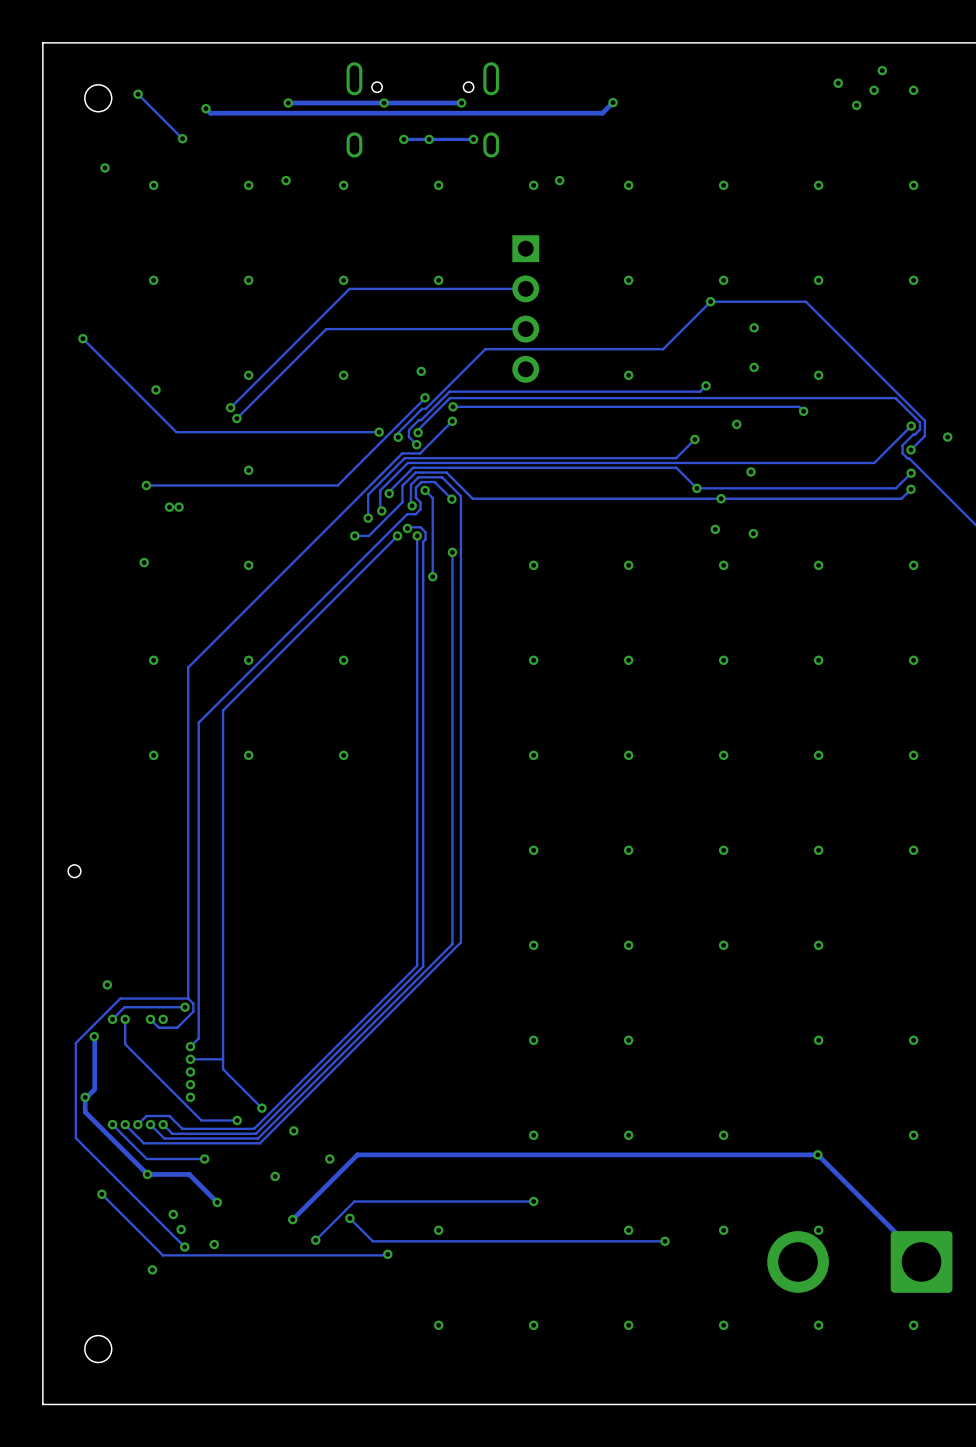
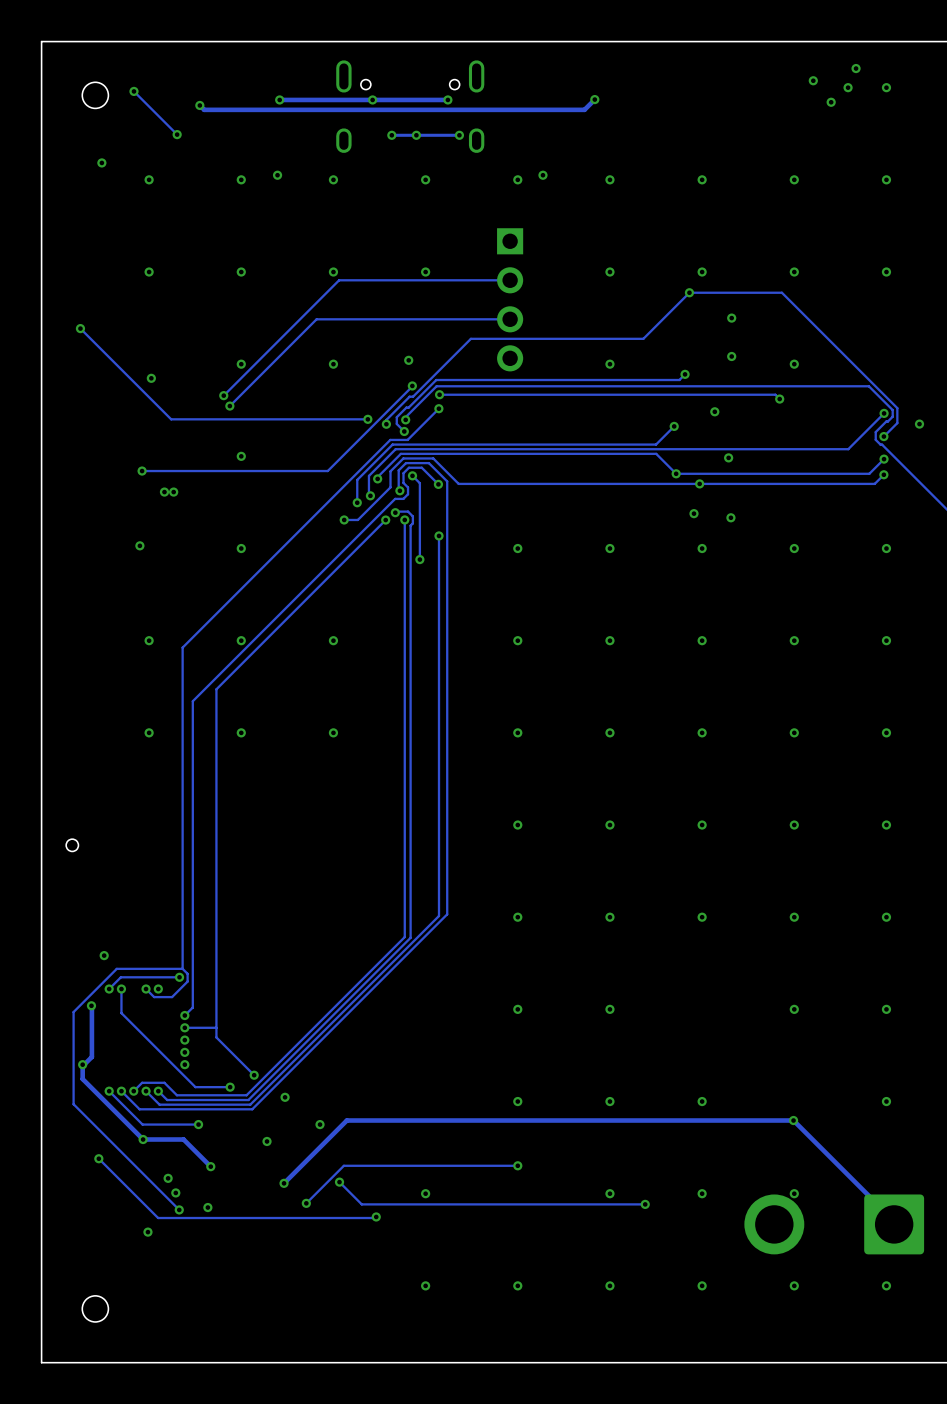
via: none -> (886, 917)

